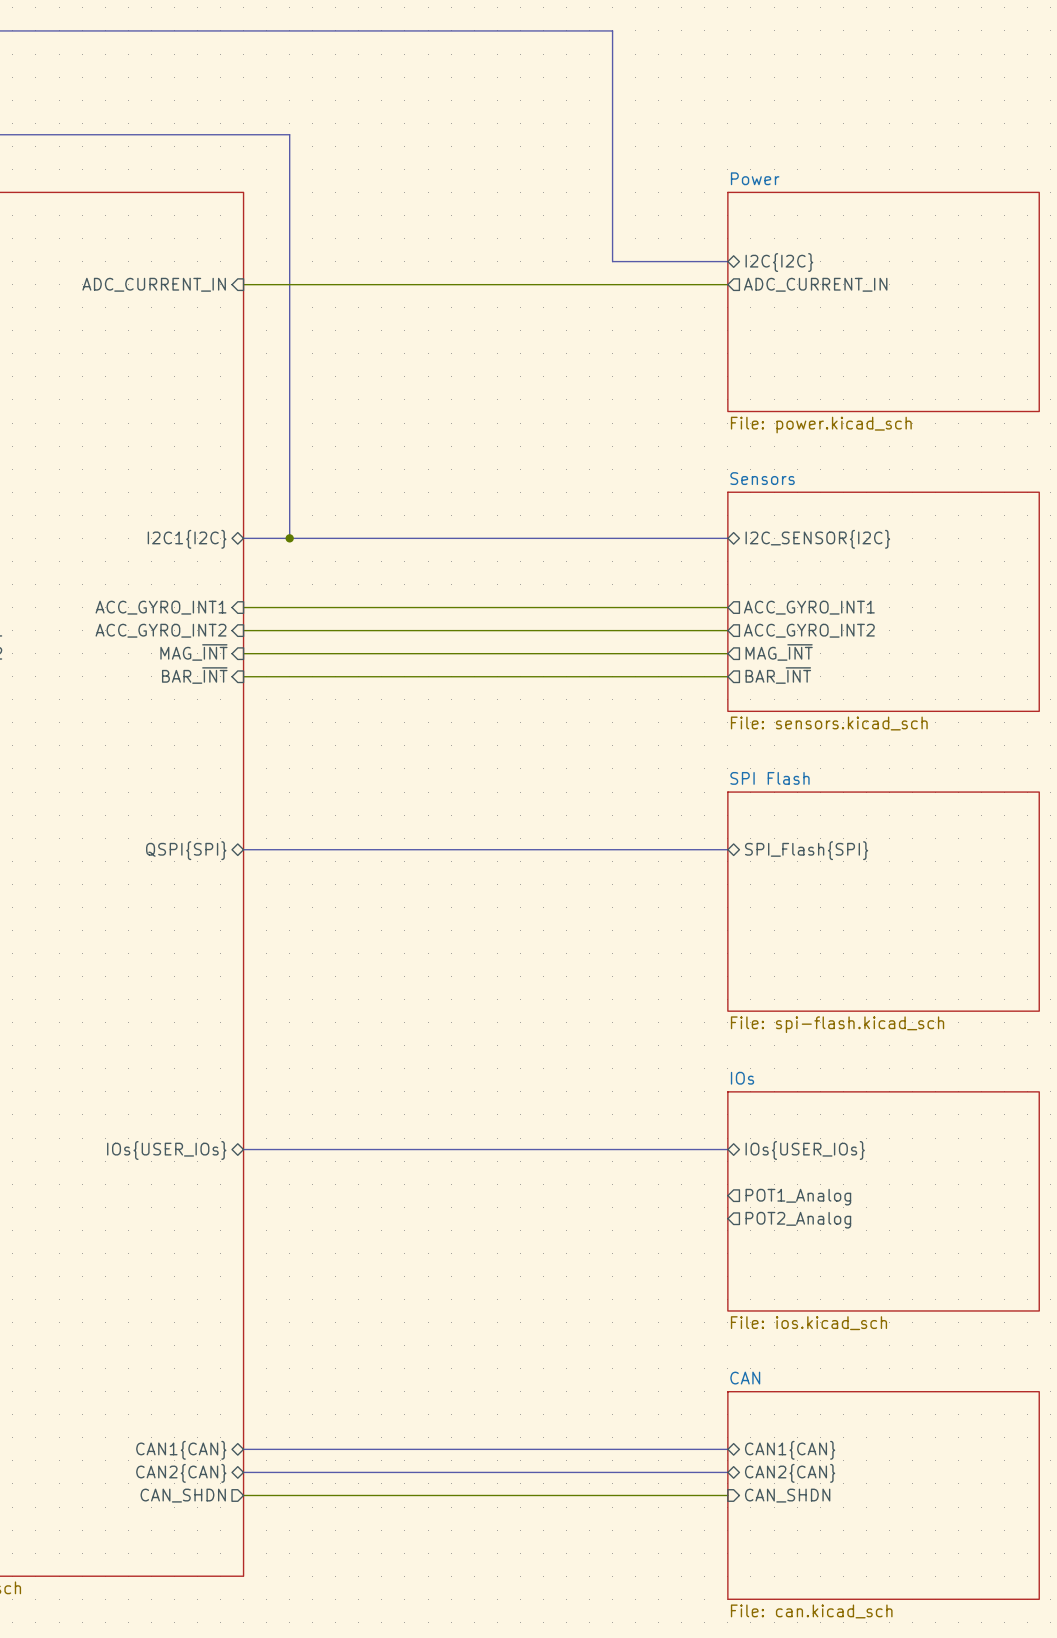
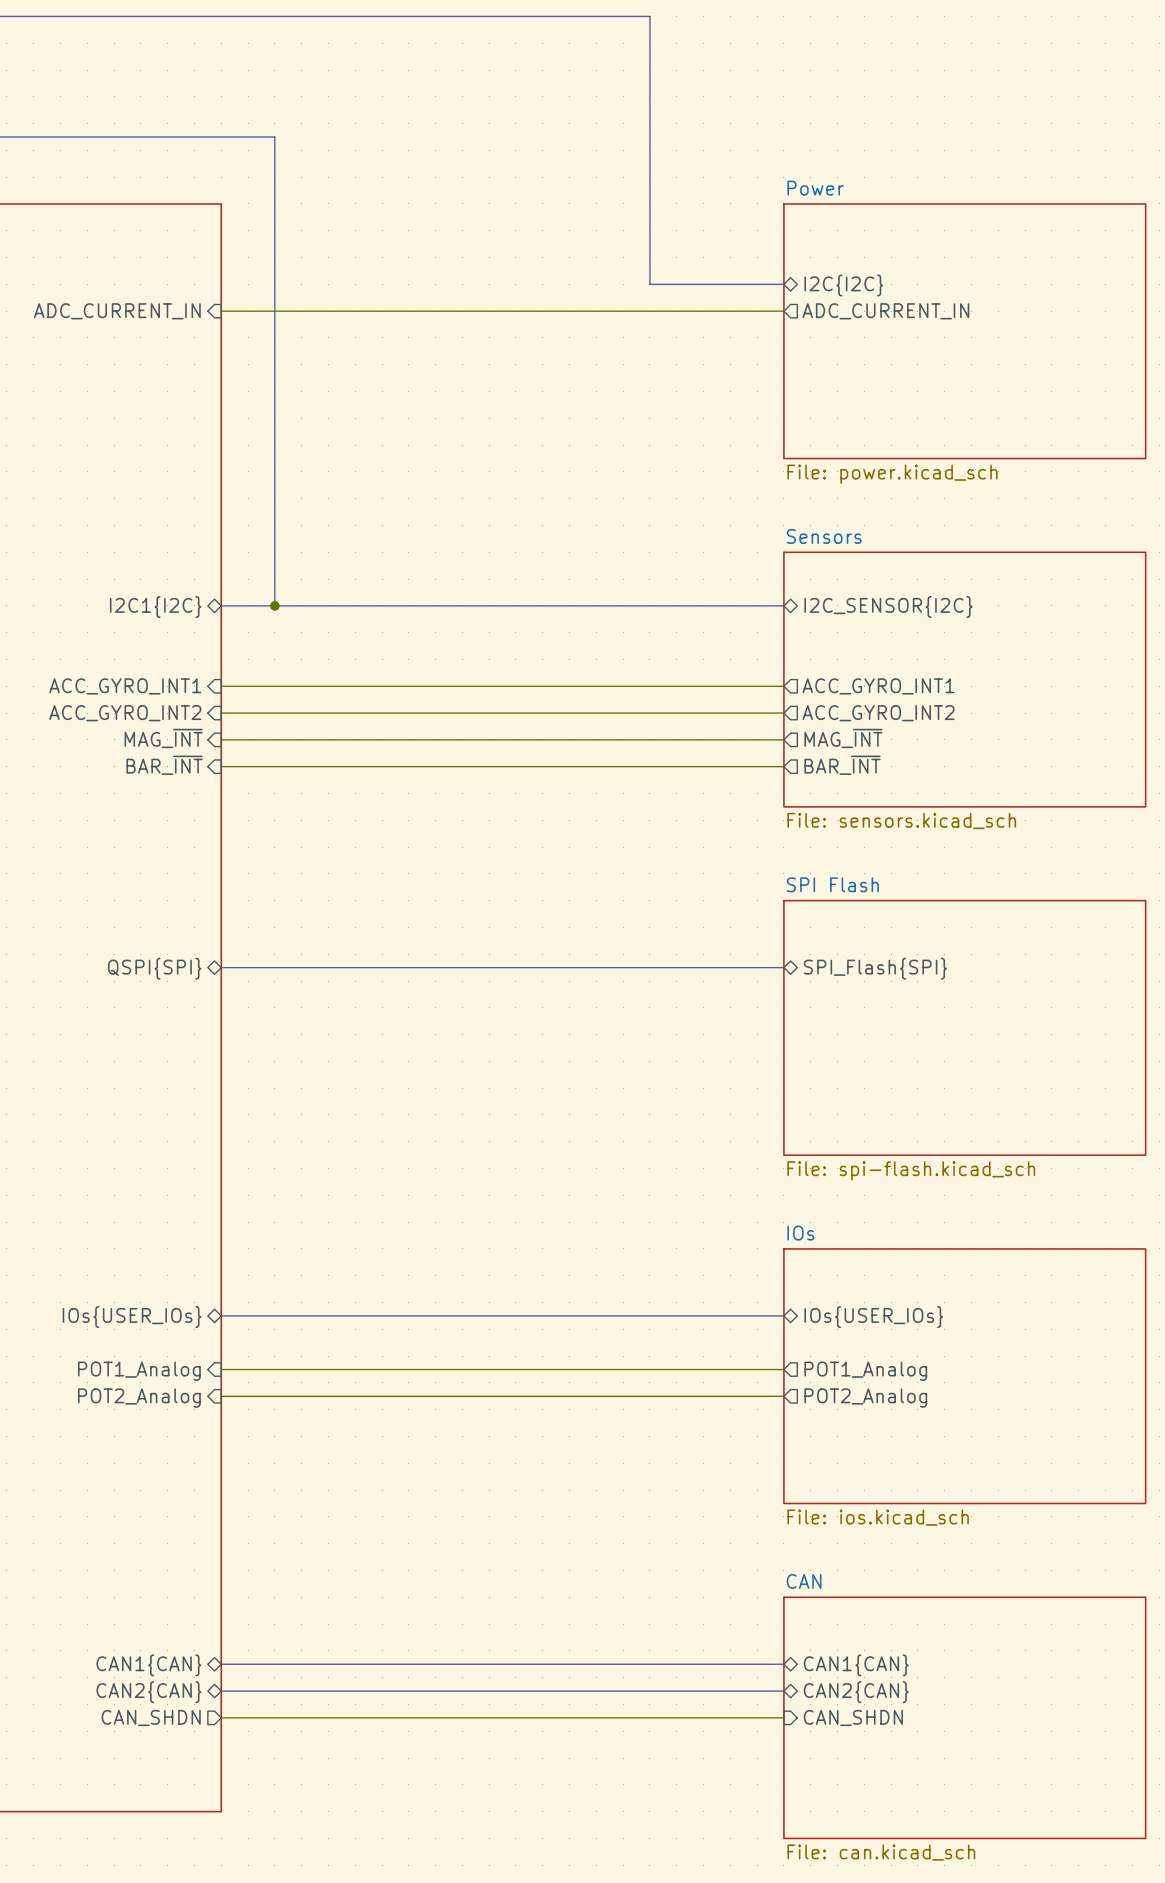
wire: none -> (221, 1369) (783, 1369)
sheet pin: none -> POT1_Analog (139, 1371)
wire: none -> (221, 1396) (783, 1396)
sheet pin: none -> POT2_Analog (139, 1398)

